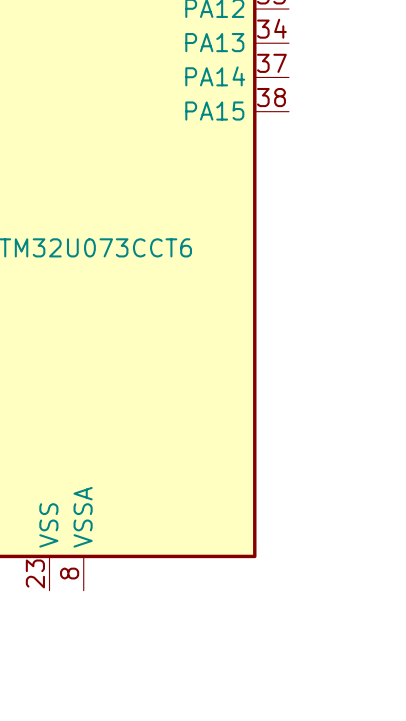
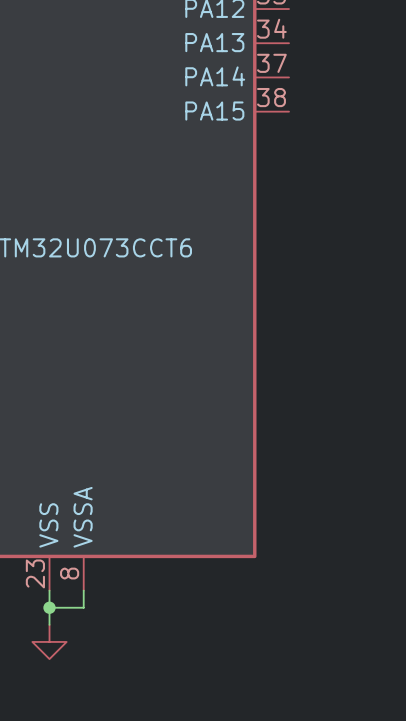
wire: none -> (49, 590) (49, 624)
wire: none -> (83, 590) (83, 607) (49, 607)
junction: none -> (49, 607)
power symbol: none -> (49, 641)

